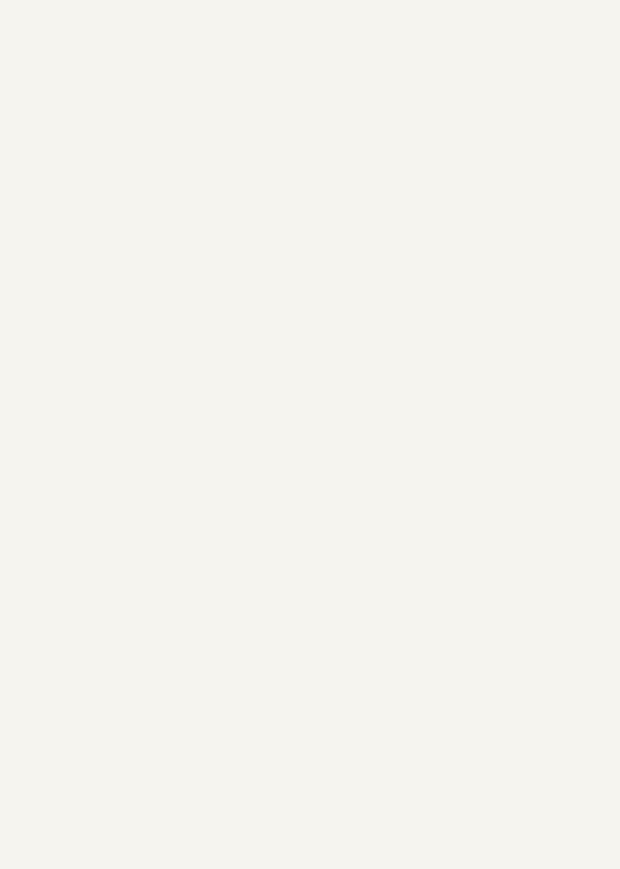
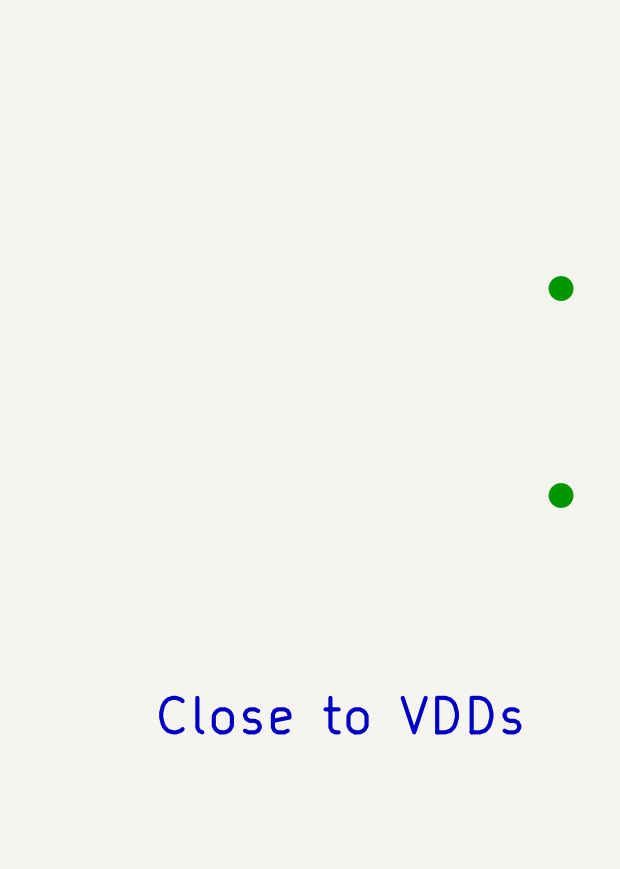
junction: none -> (561, 288)
junction: none -> (561, 495)
text: none -> Close to VDDs (340, 715)

